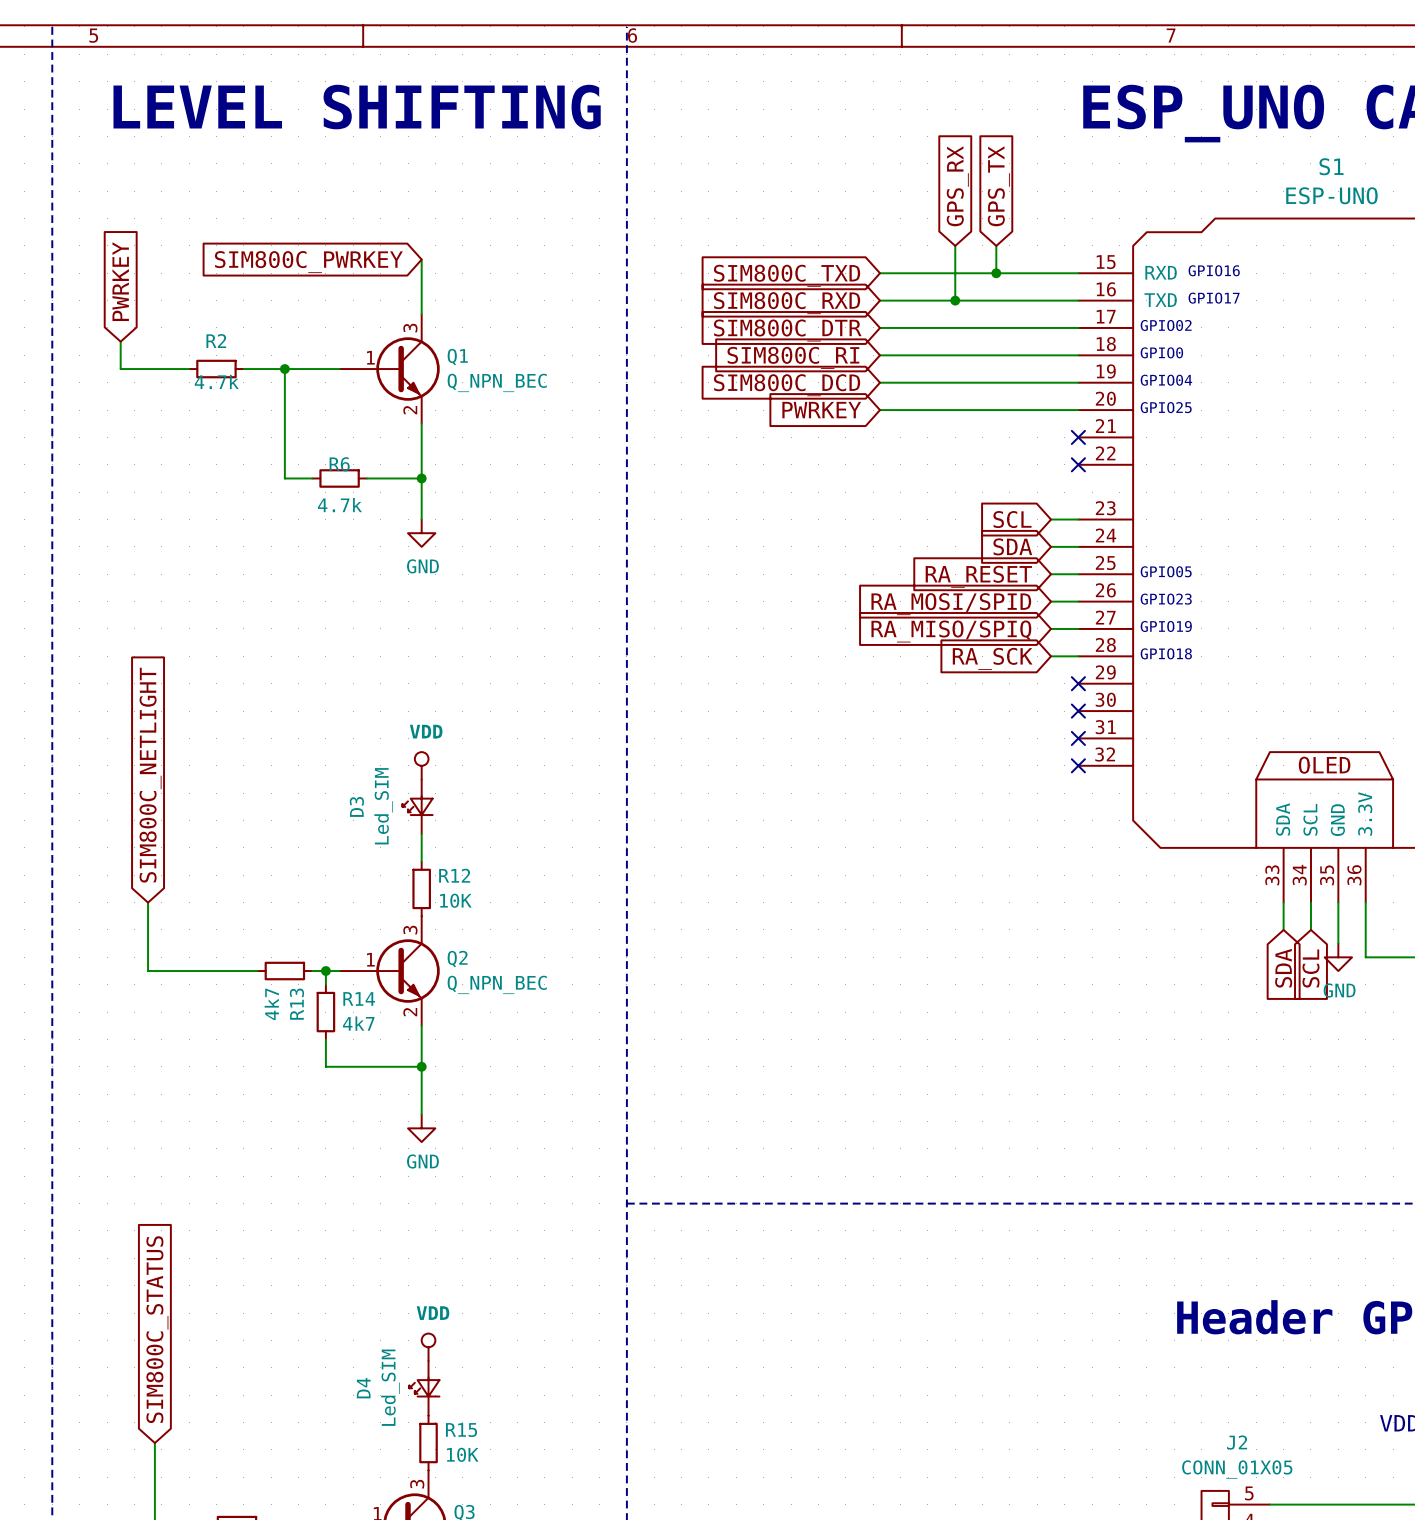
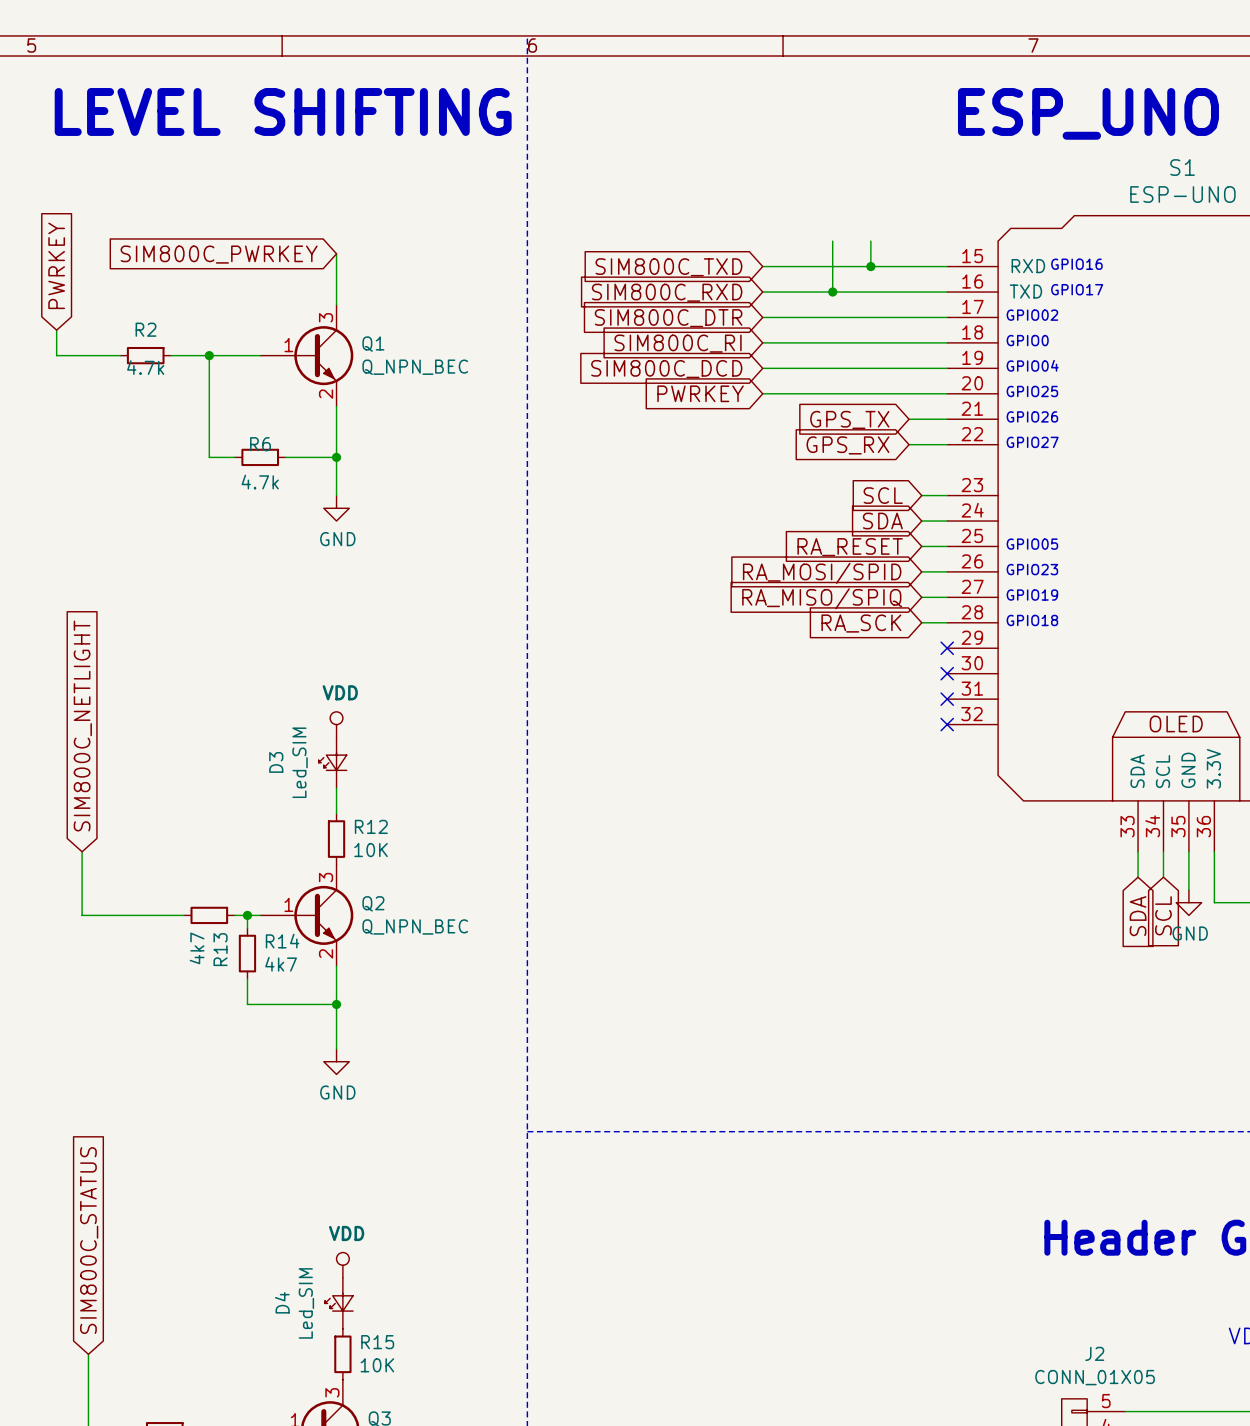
global label rotation: 0° (957, 186) -> 90° counterclockwise (847, 445)
global label position: GPS_RX (957, 186) -> GPS_RX (847, 445)
global label rotation: 0° (998, 186) -> 90° counterclockwise (849, 419)
global label position: GPS_TX (998, 186) -> GPS_TX (849, 419)
text: none -> GPIO26 (1032, 416)
wire: none -> (909, 419) (947, 419)
no-connect mark: (1078, 437) -> none
text: none -> GPIO27 (1032, 442)
wire: none -> (909, 444) (947, 444)
no-connect mark: (1078, 464) -> none

